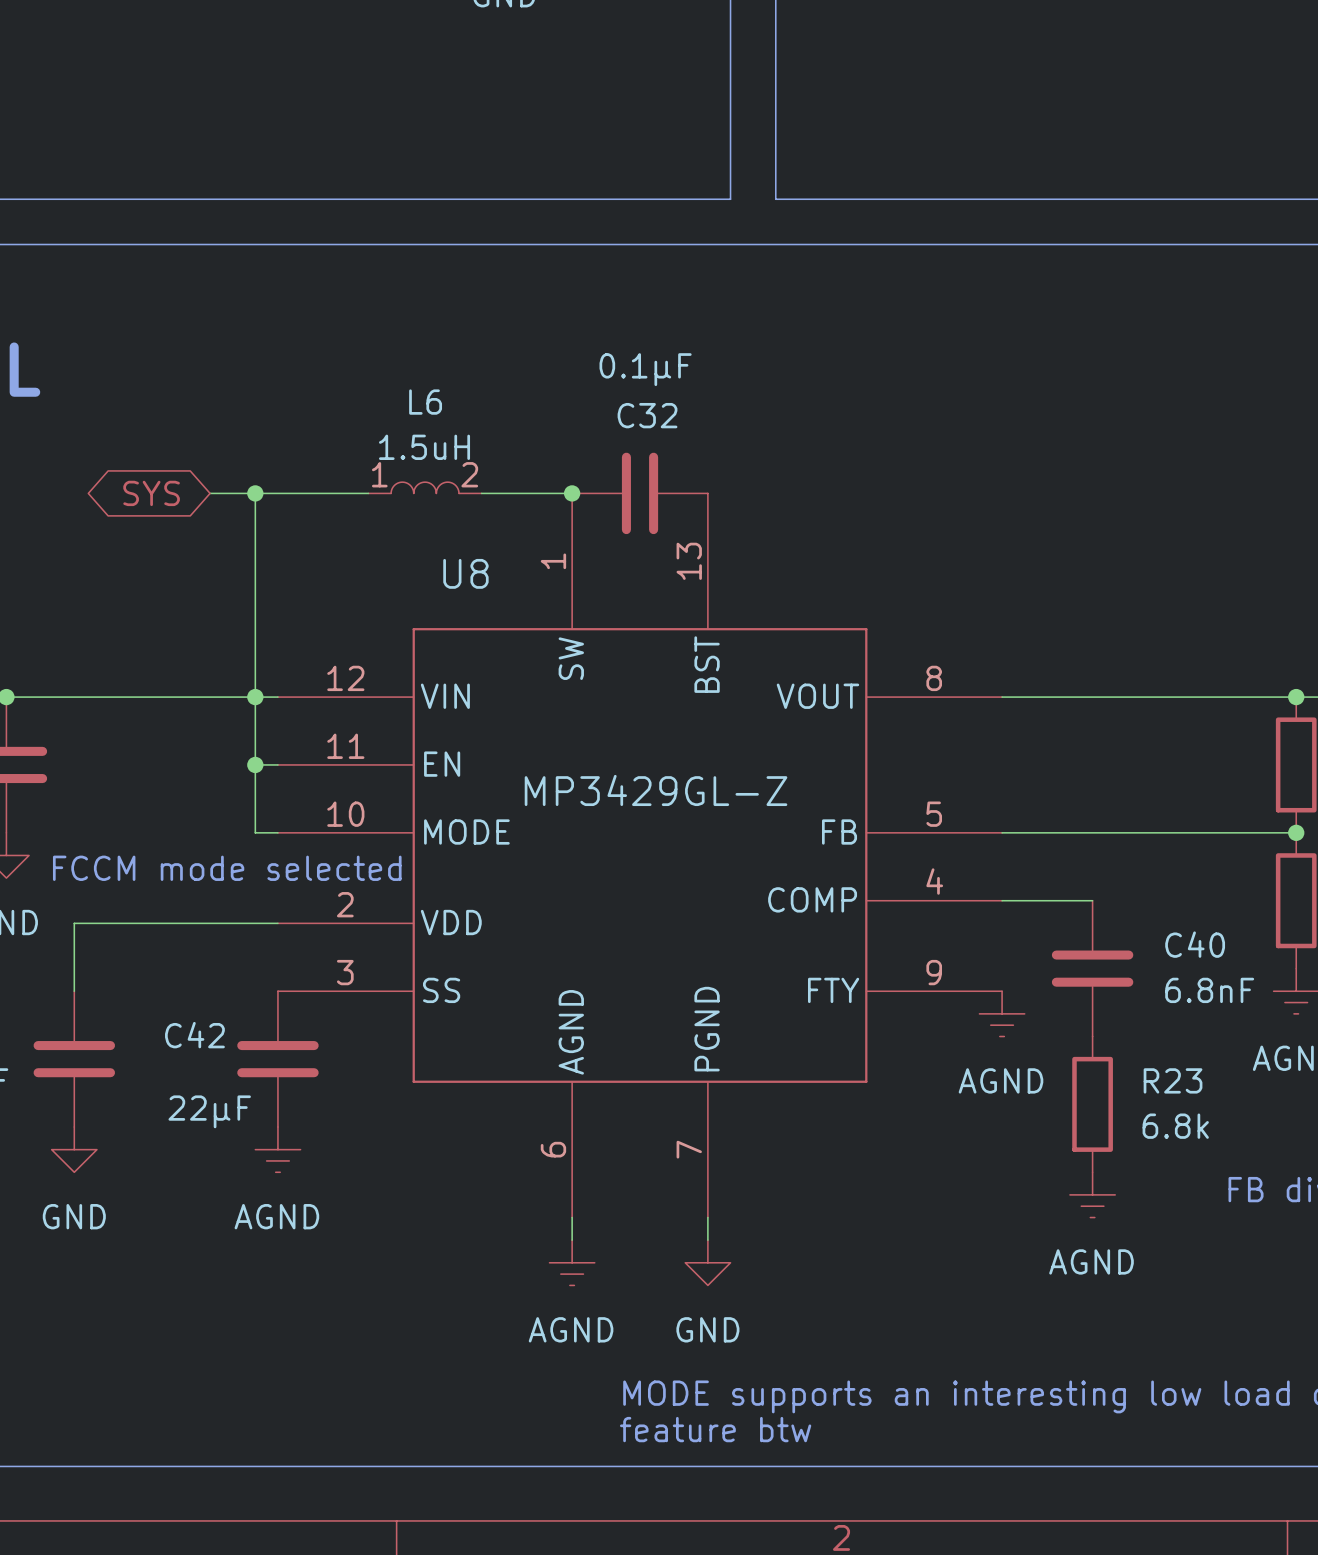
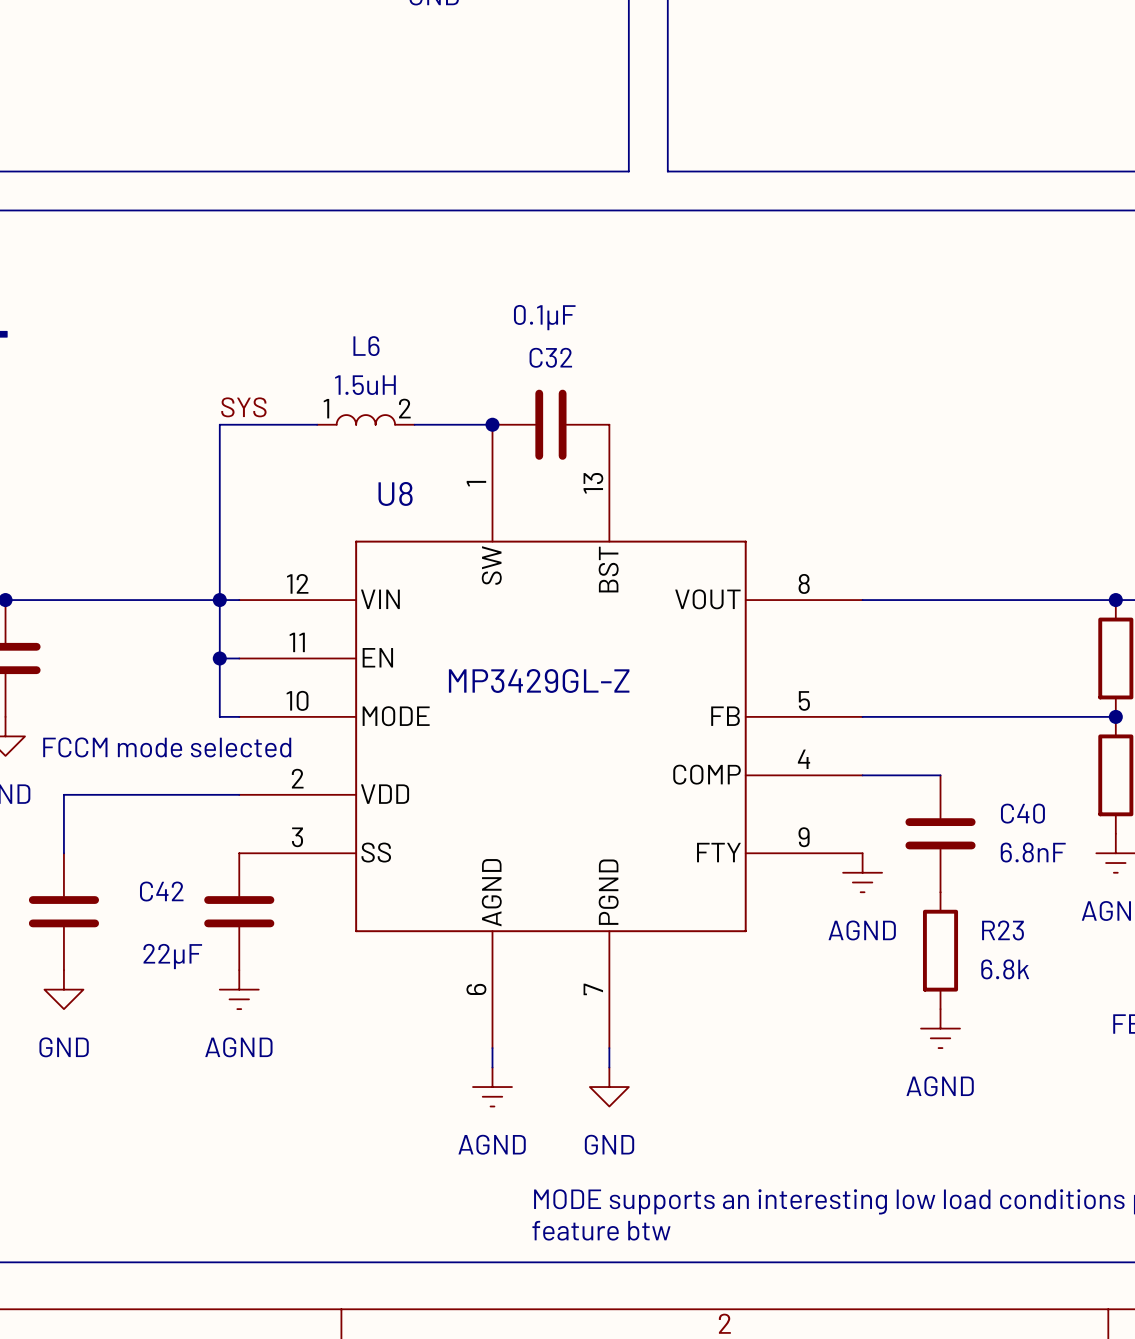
label: none -> SYS (243, 407)
global label: SYS (151, 493) -> none
wire: (210, 493) (255, 493) -> none
junction: (255, 493) -> none

